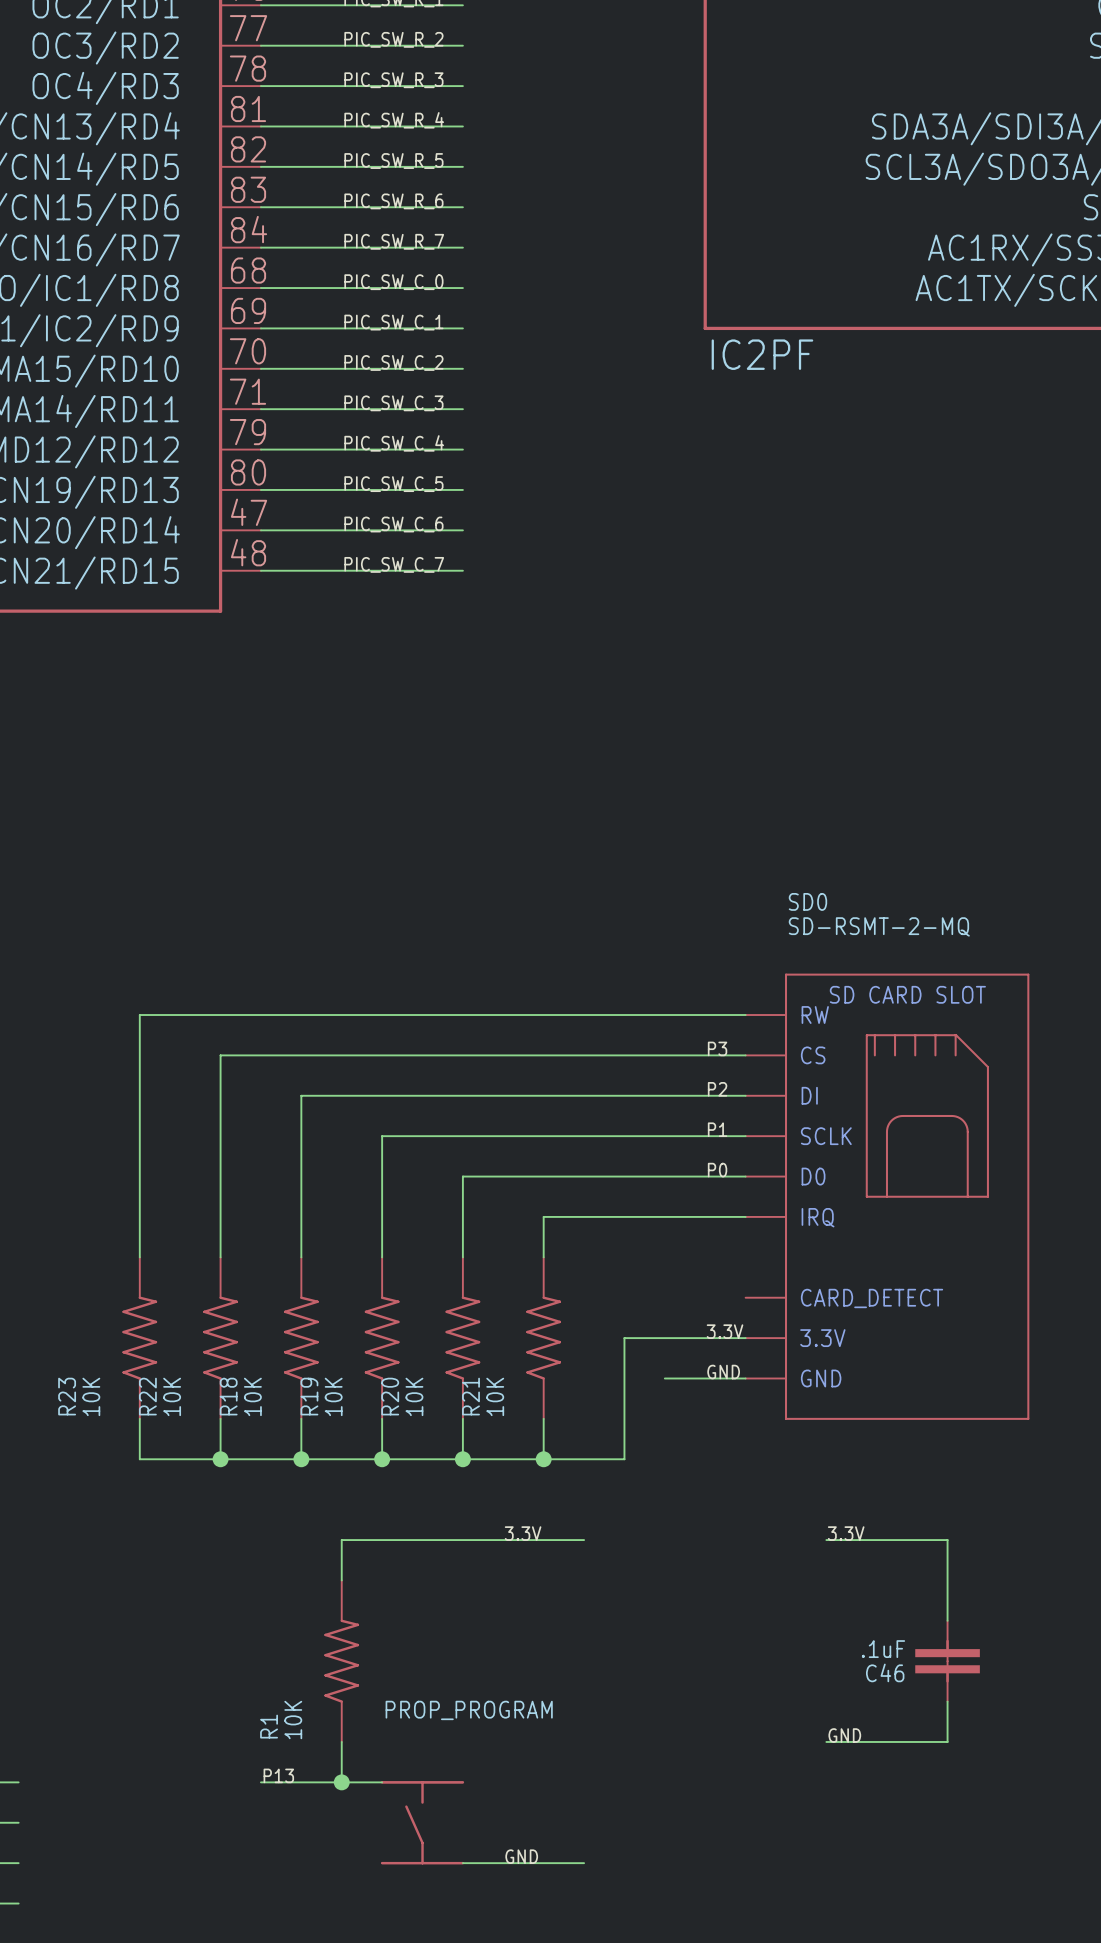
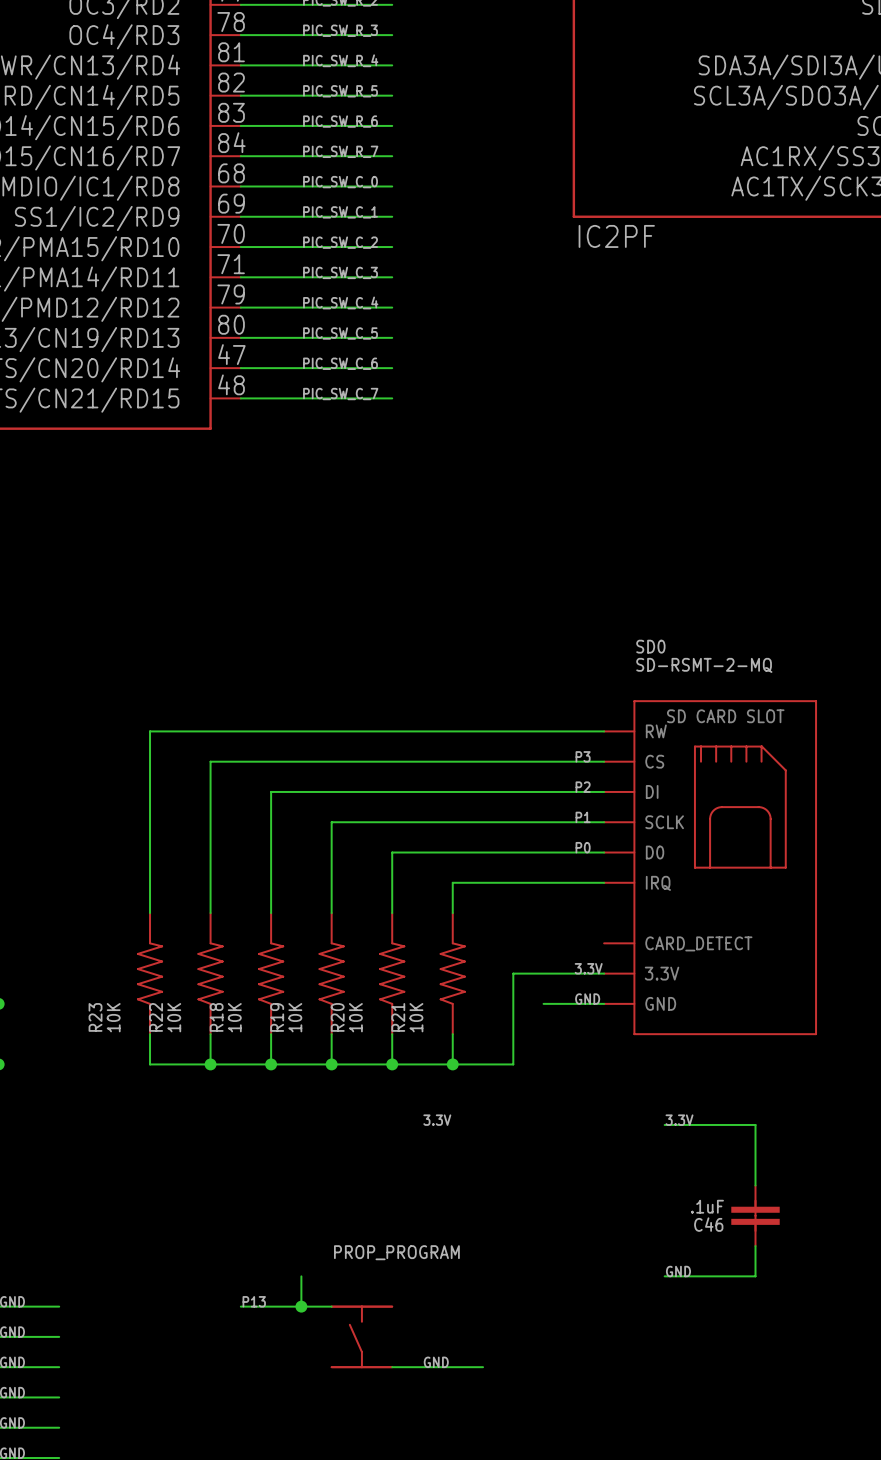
wire: (584, 1540) (341, 1540) (341, 1580) -> none
R1: 10K (341, 1661) -> none

